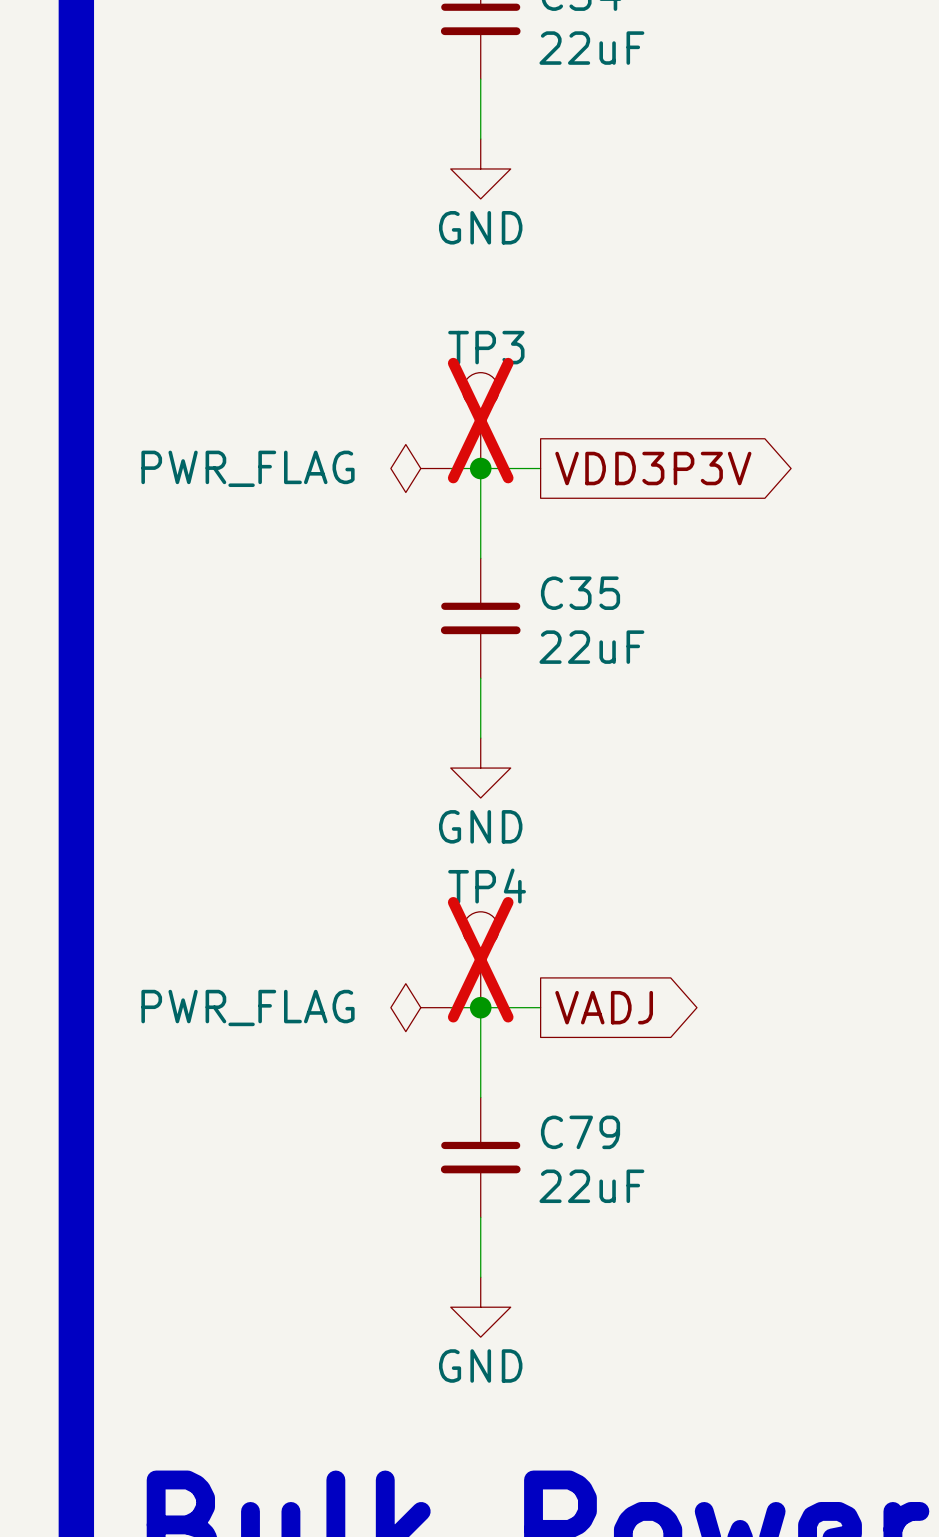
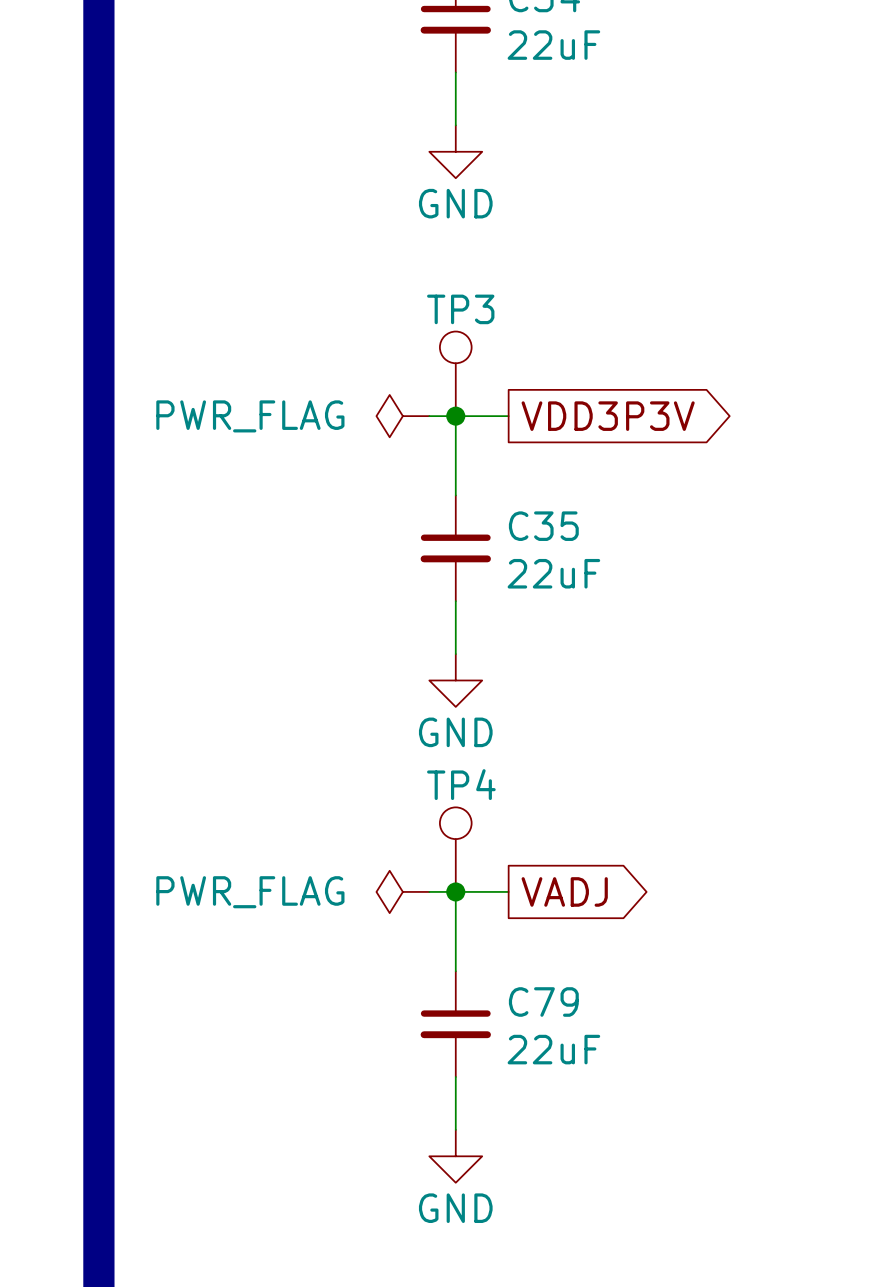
TP3 do-not-place cross: (480, 420) -> none
TP4 do-not-place cross: (480, 959) -> none

